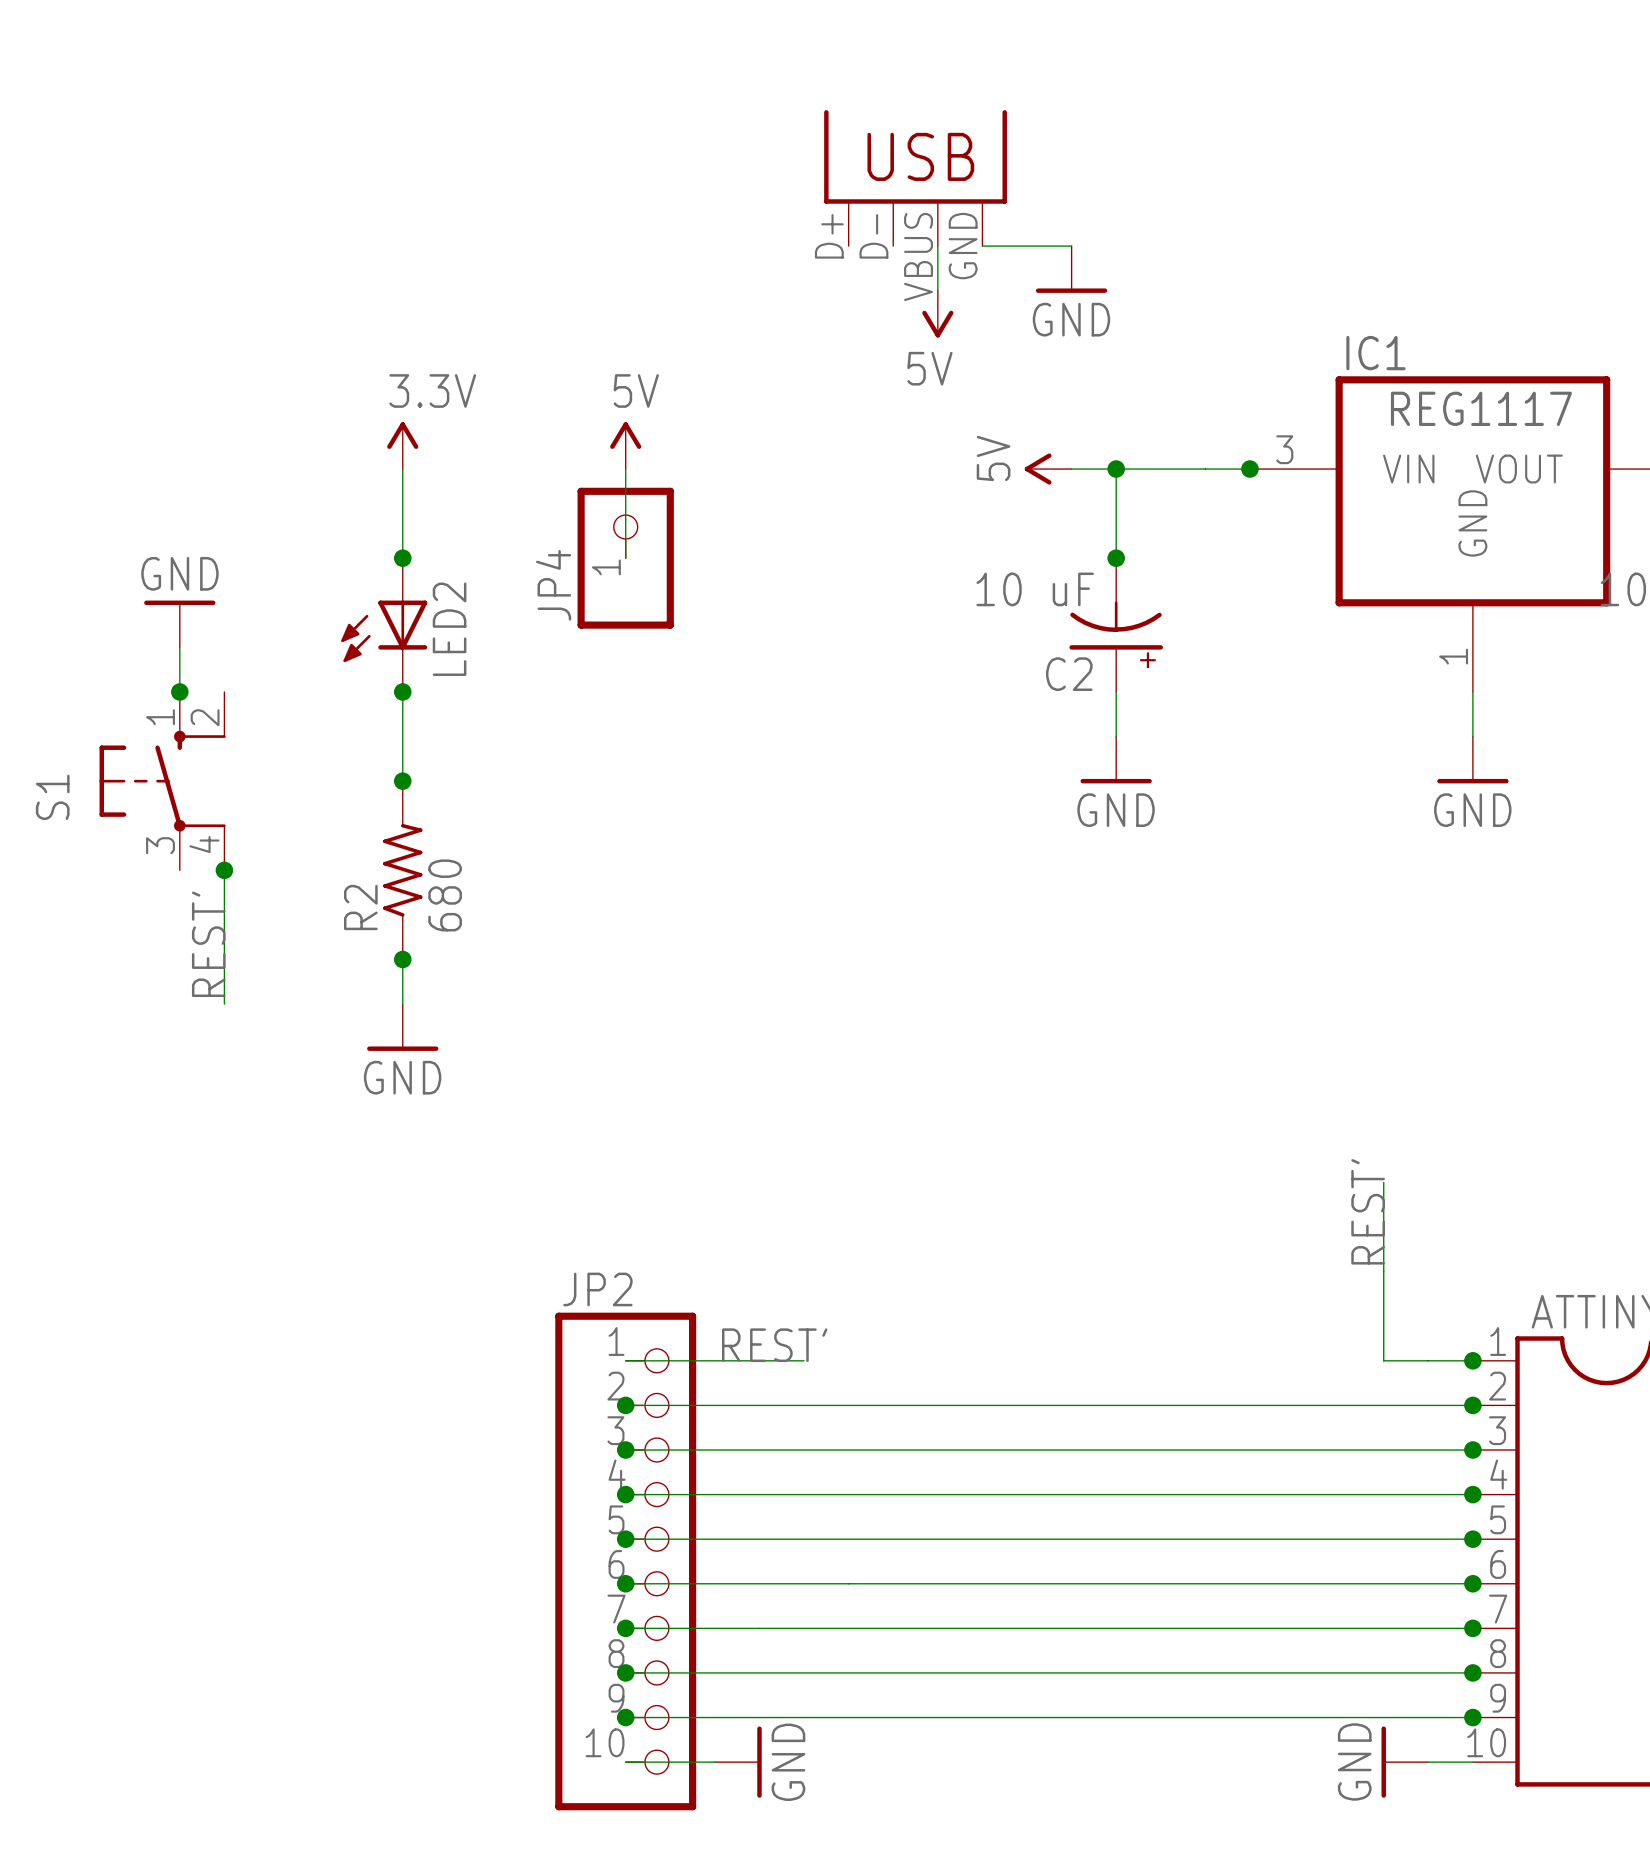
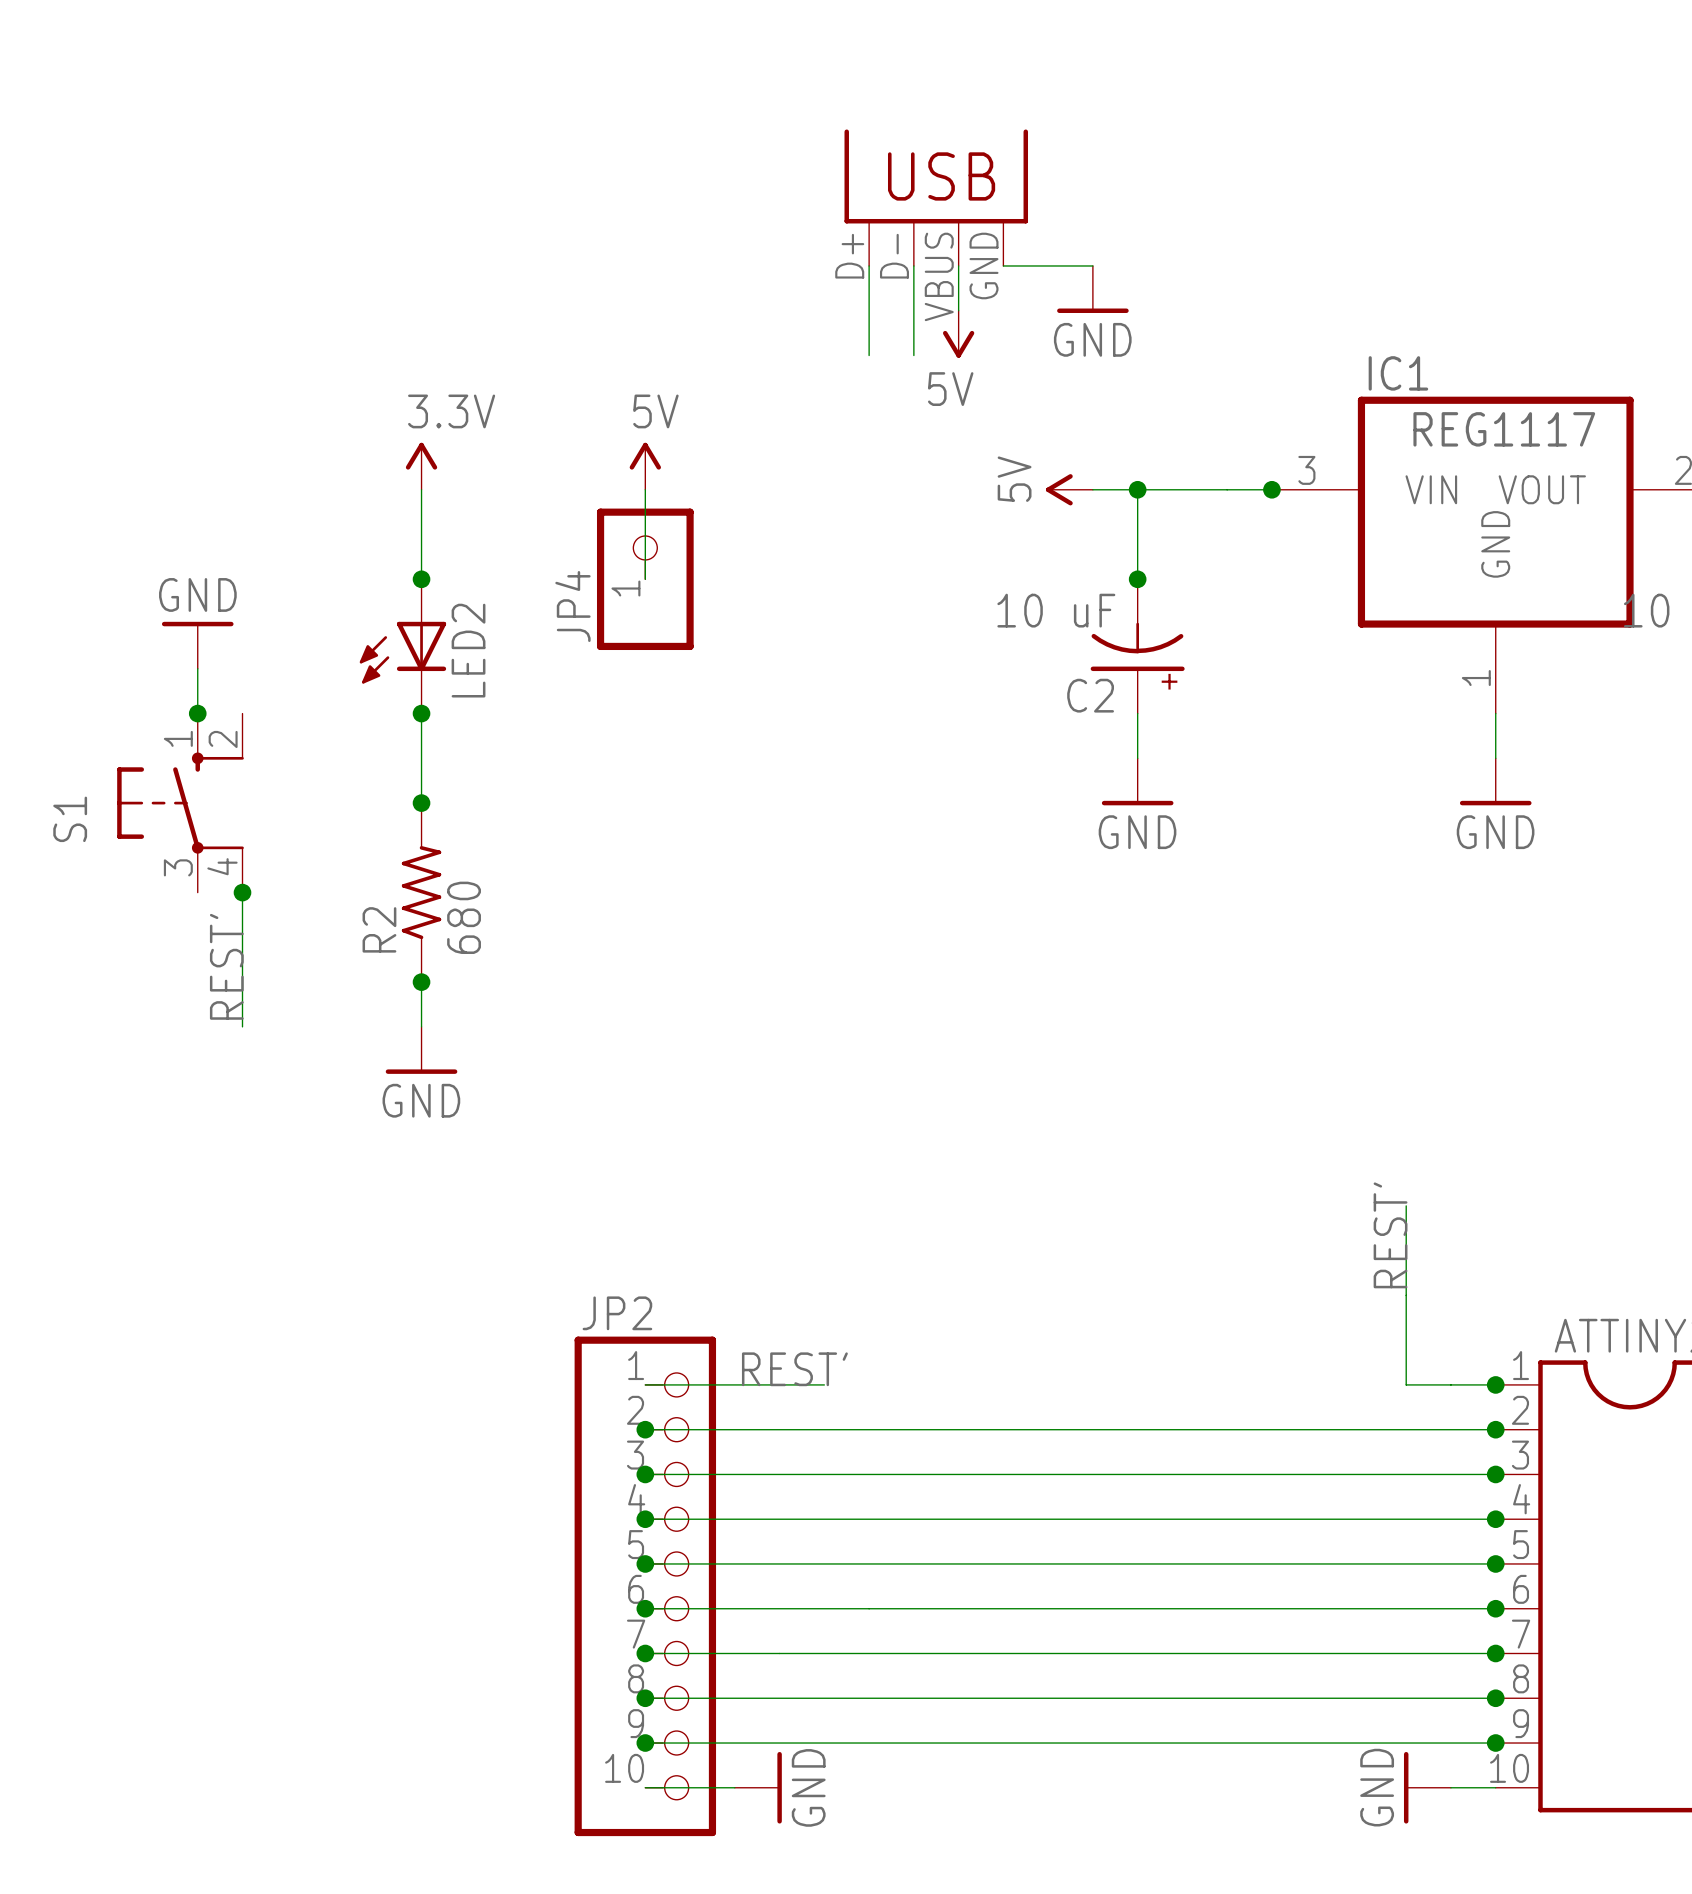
wire: none -> (869, 265) (869, 355)
wire: none -> (913, 265) (913, 355)

